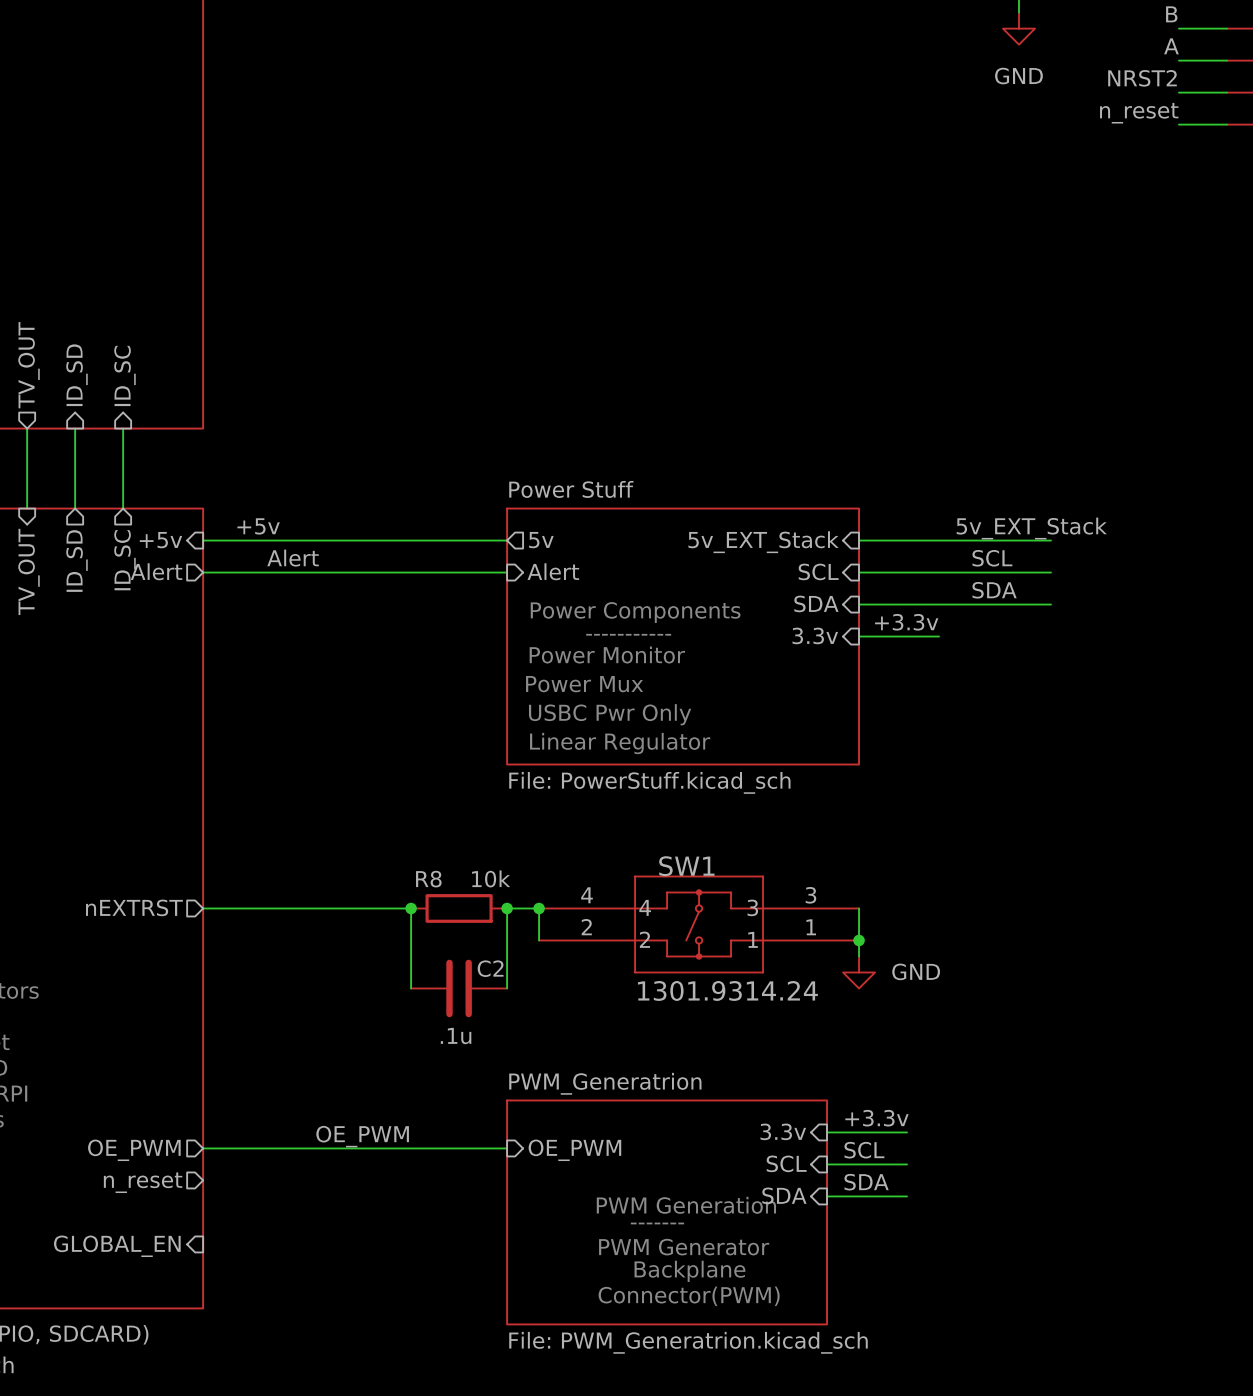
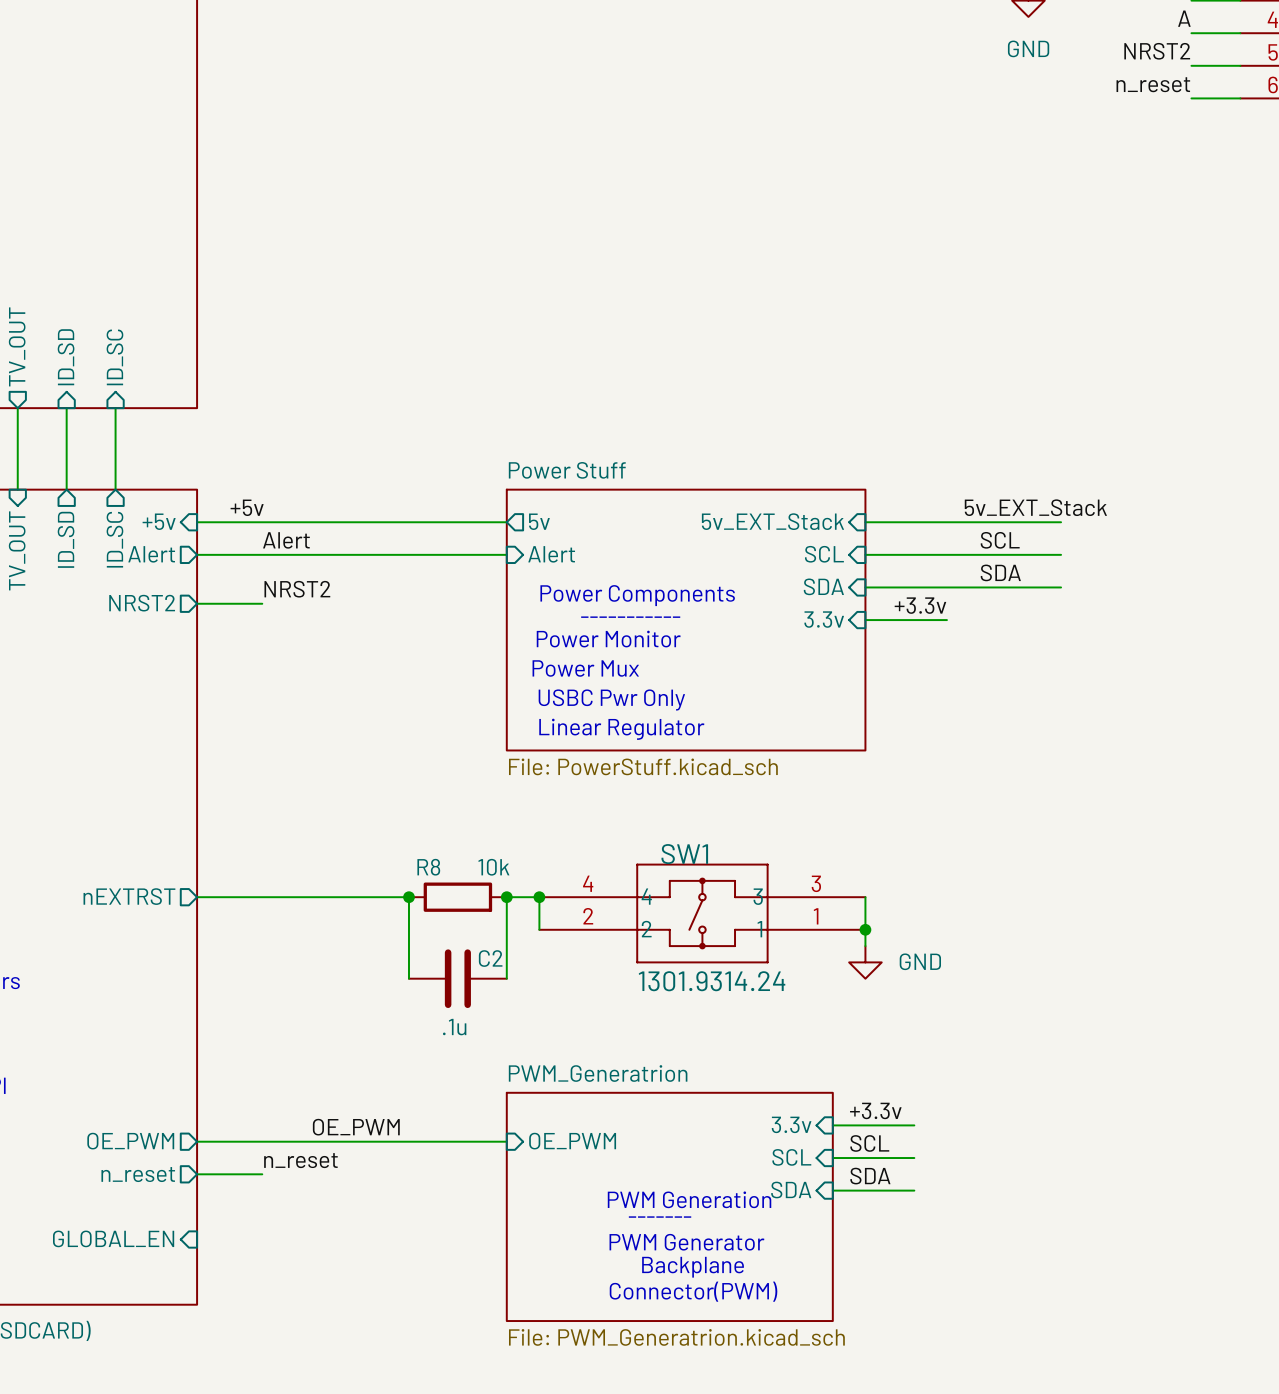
label: none -> NRST2 (297, 589)
sheet pin: none -> NRST2 (142, 603)
wire: none -> (197, 603) (262, 603)
label: none -> n_reset (300, 1160)
wire: none -> (197, 1174) (262, 1174)

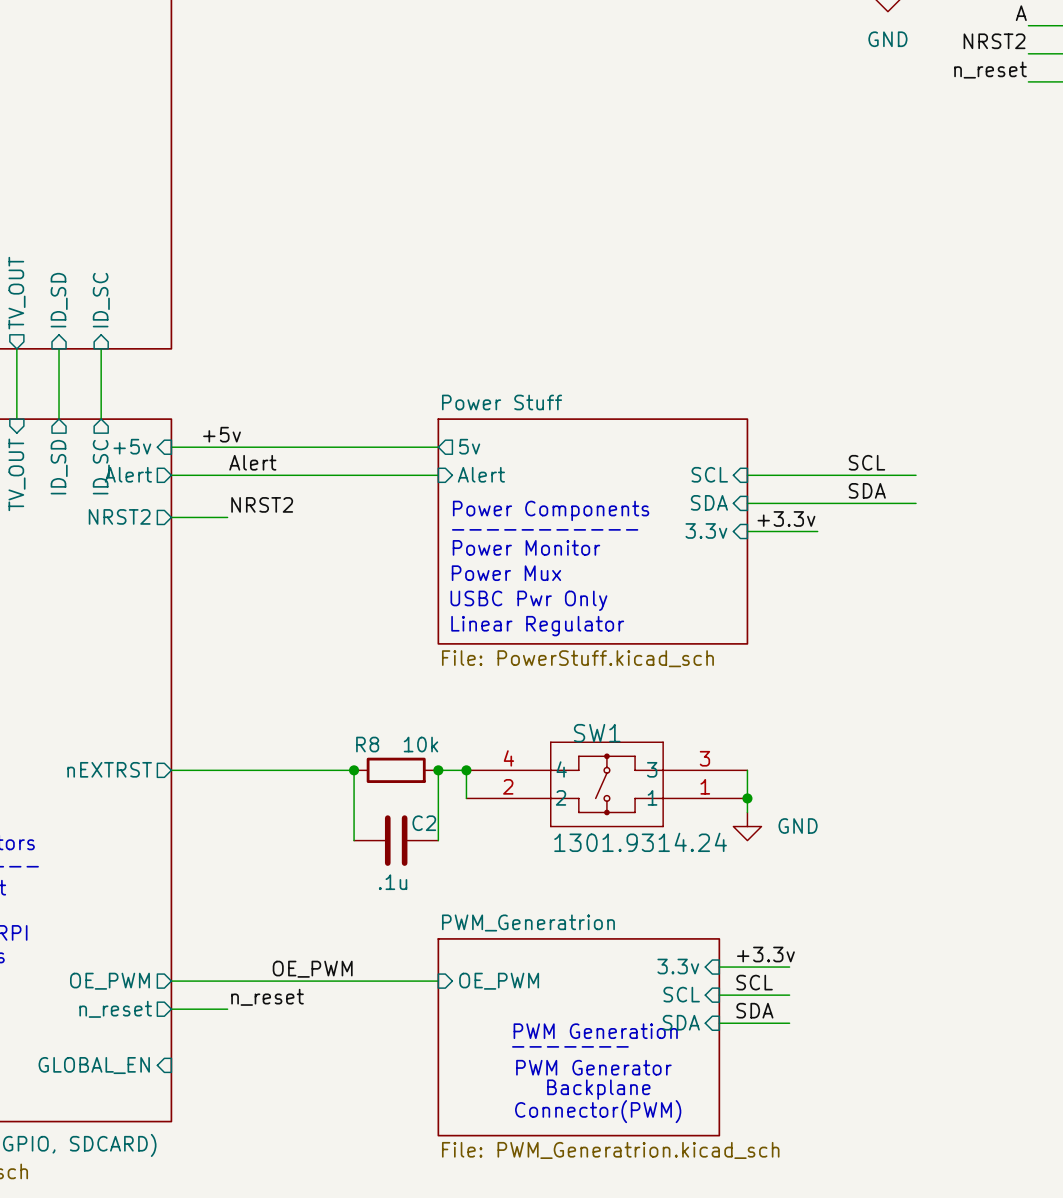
label: 5v_EXT_Stack (1035, 507) -> none
sheet pin: 5v_EXT_Stack (772, 521) -> none
wire: (865, 522) (1061, 522) -> none

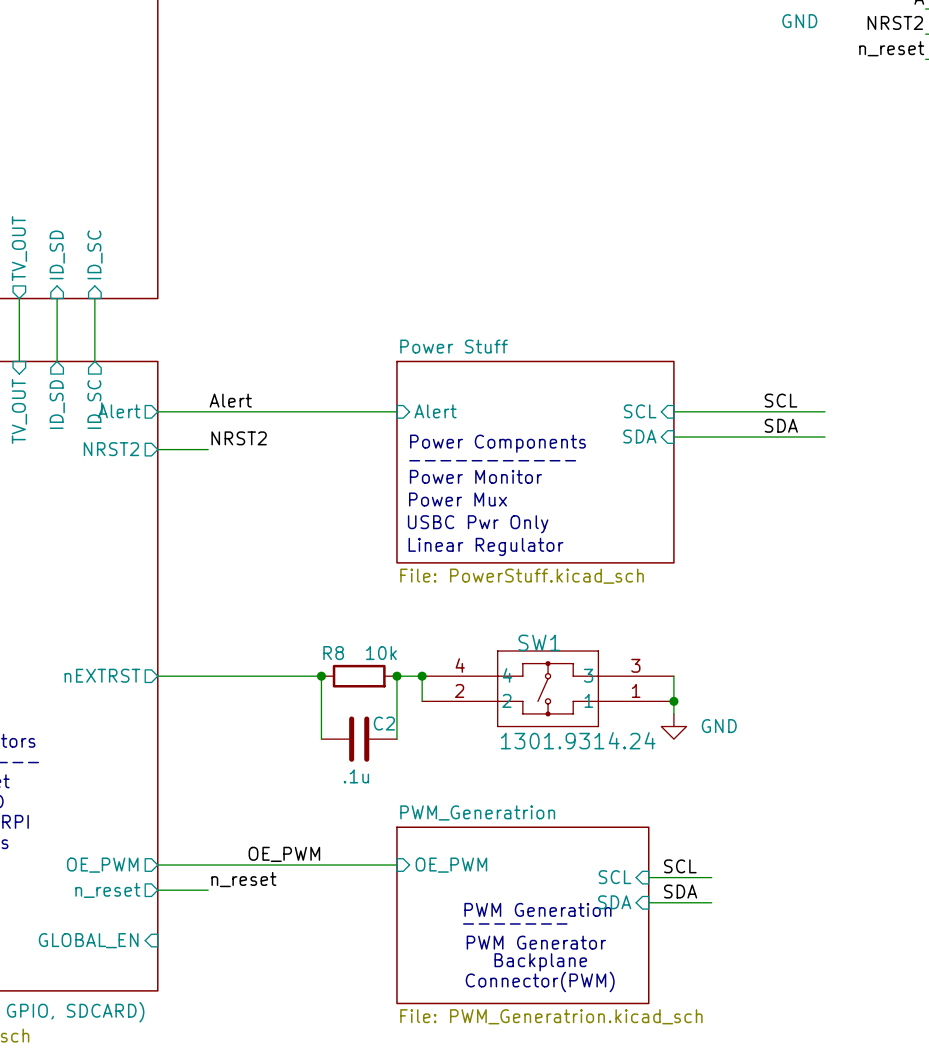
label: +5v (222, 434) -> none
sheet pin: +5v (132, 446) -> none
sheet pin: 5v (469, 446) -> none
wire: (171, 447) (438, 447) -> none
label: +3.3v (786, 518) -> none
sheet pin: 3.3v (706, 530) -> none
wire: (747, 531) (817, 531) -> none
label: +3.3v (765, 954) -> none
sheet pin: 3.3v (678, 966) -> none
wire: (719, 967) (789, 967) -> none

